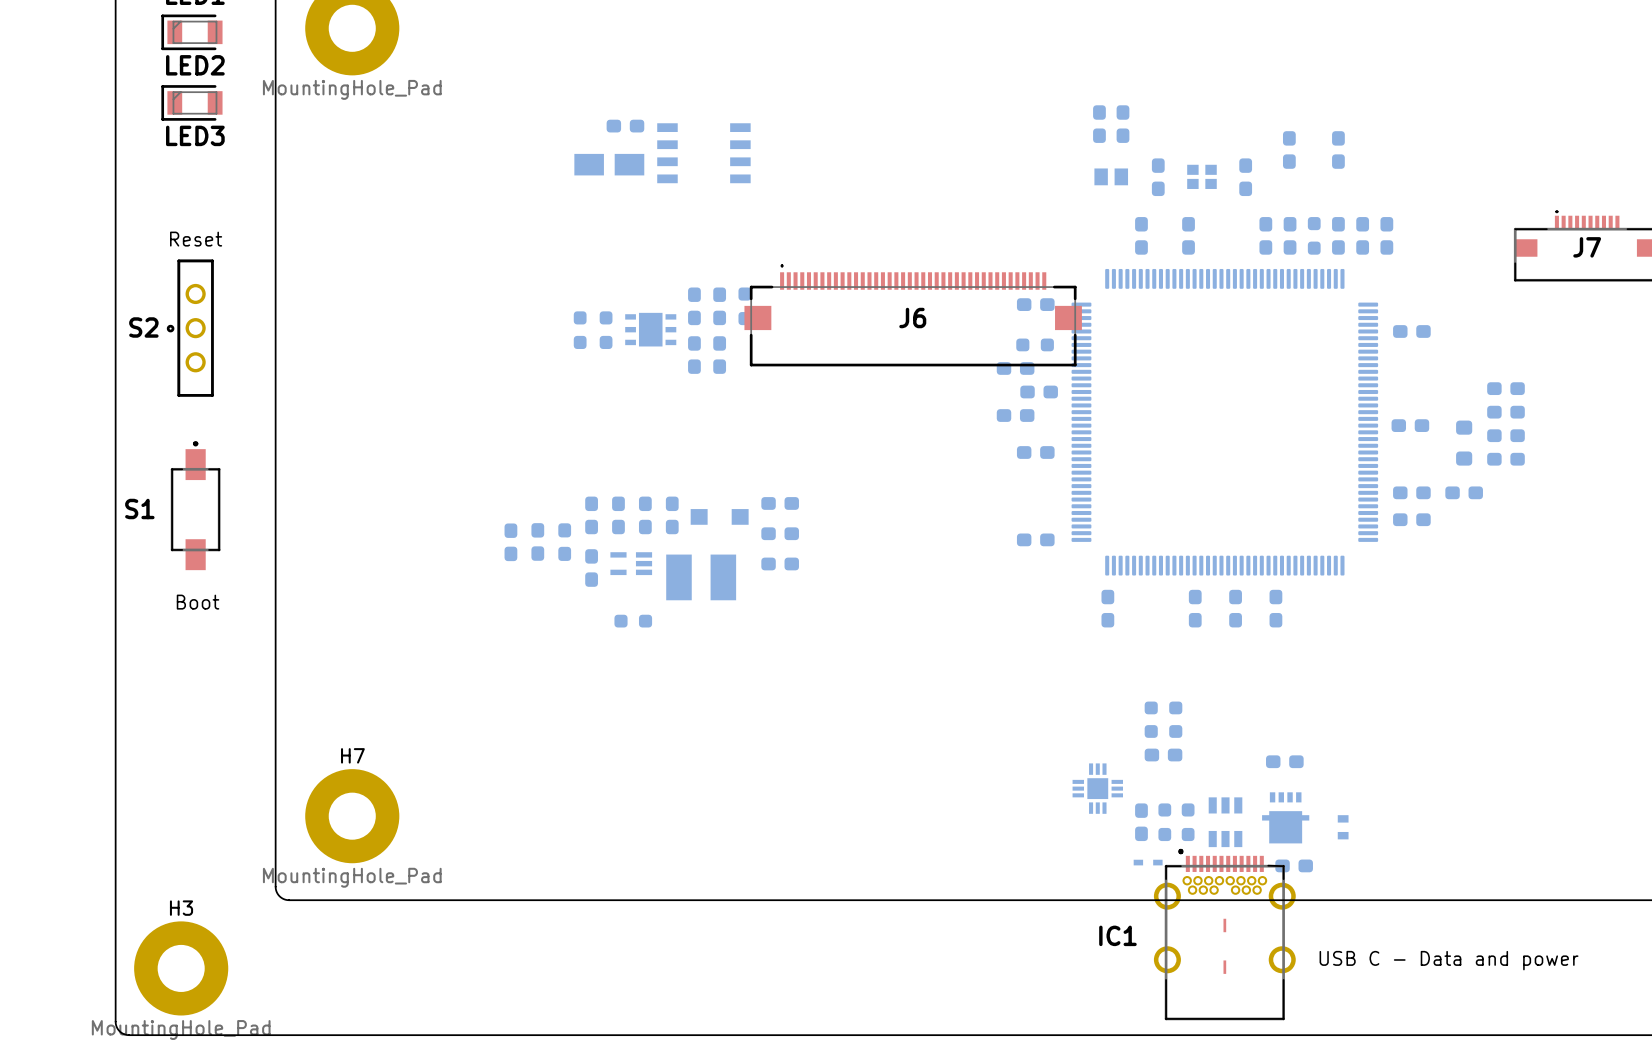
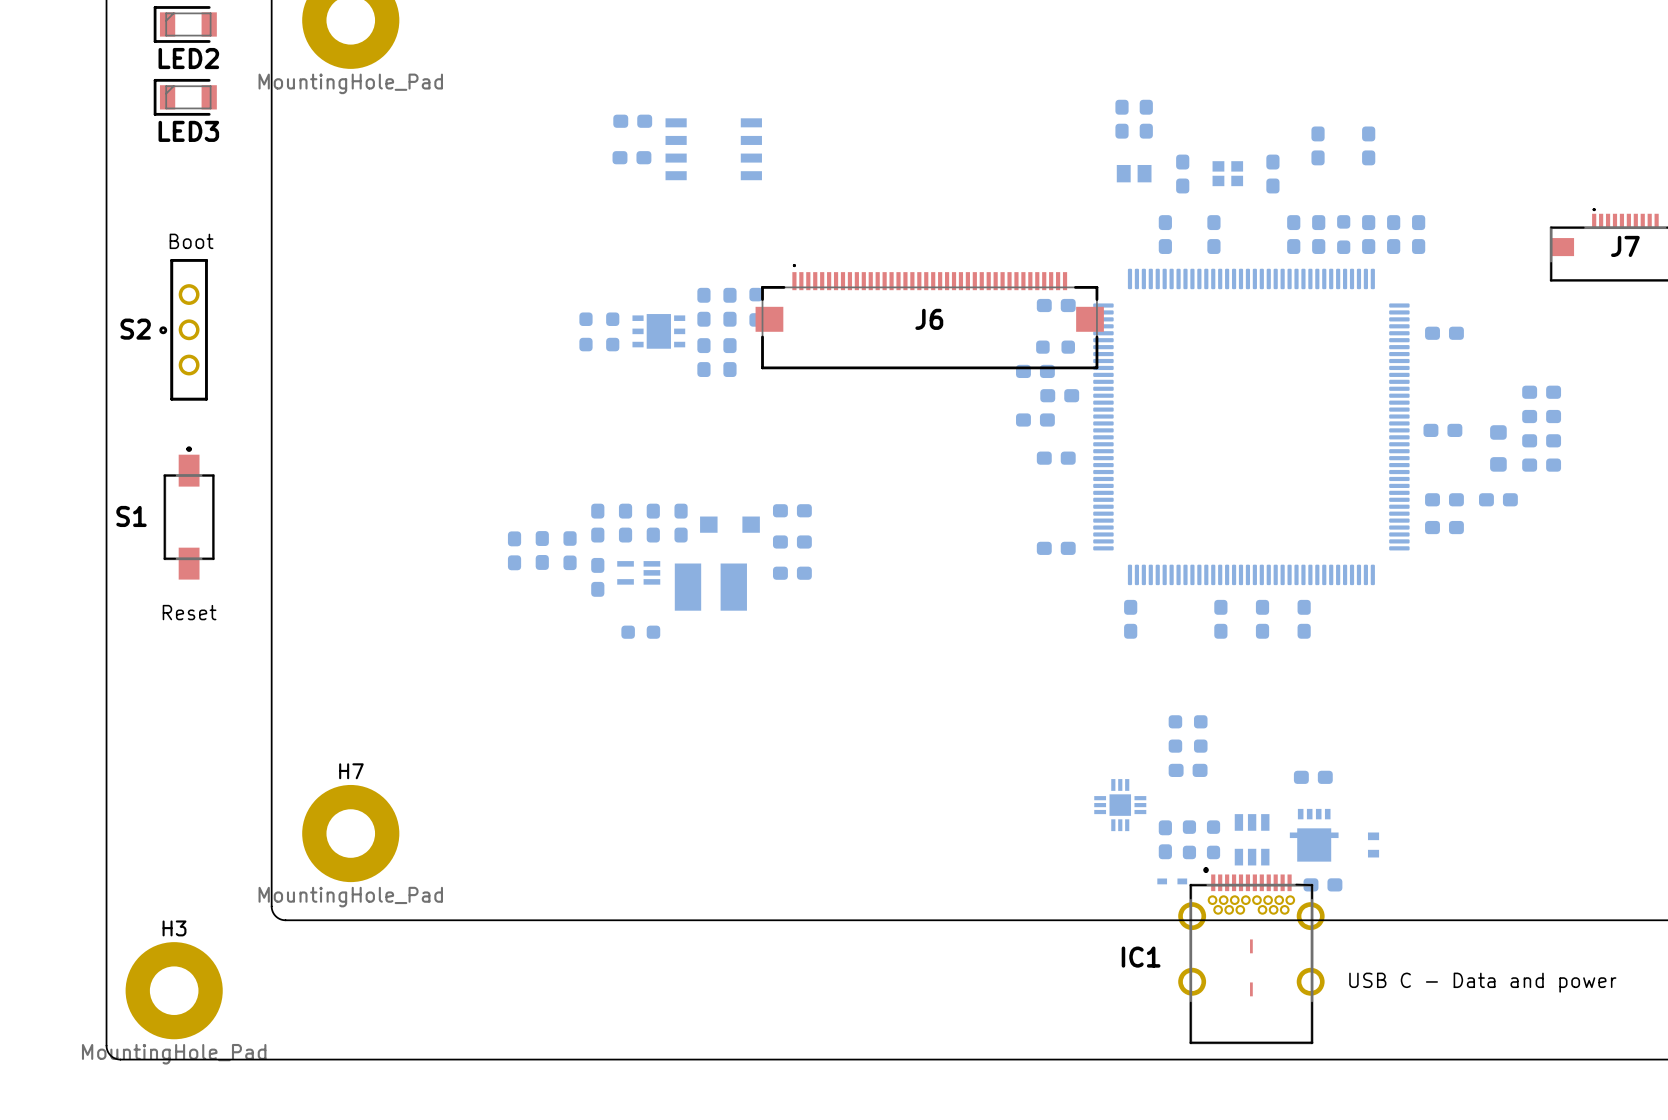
part: none -> (631, 157)
part: (609, 164) -> none
text: Reset (196, 239) -> Boot (191, 241)
text: Boot (198, 602) -> Reset (189, 612)

